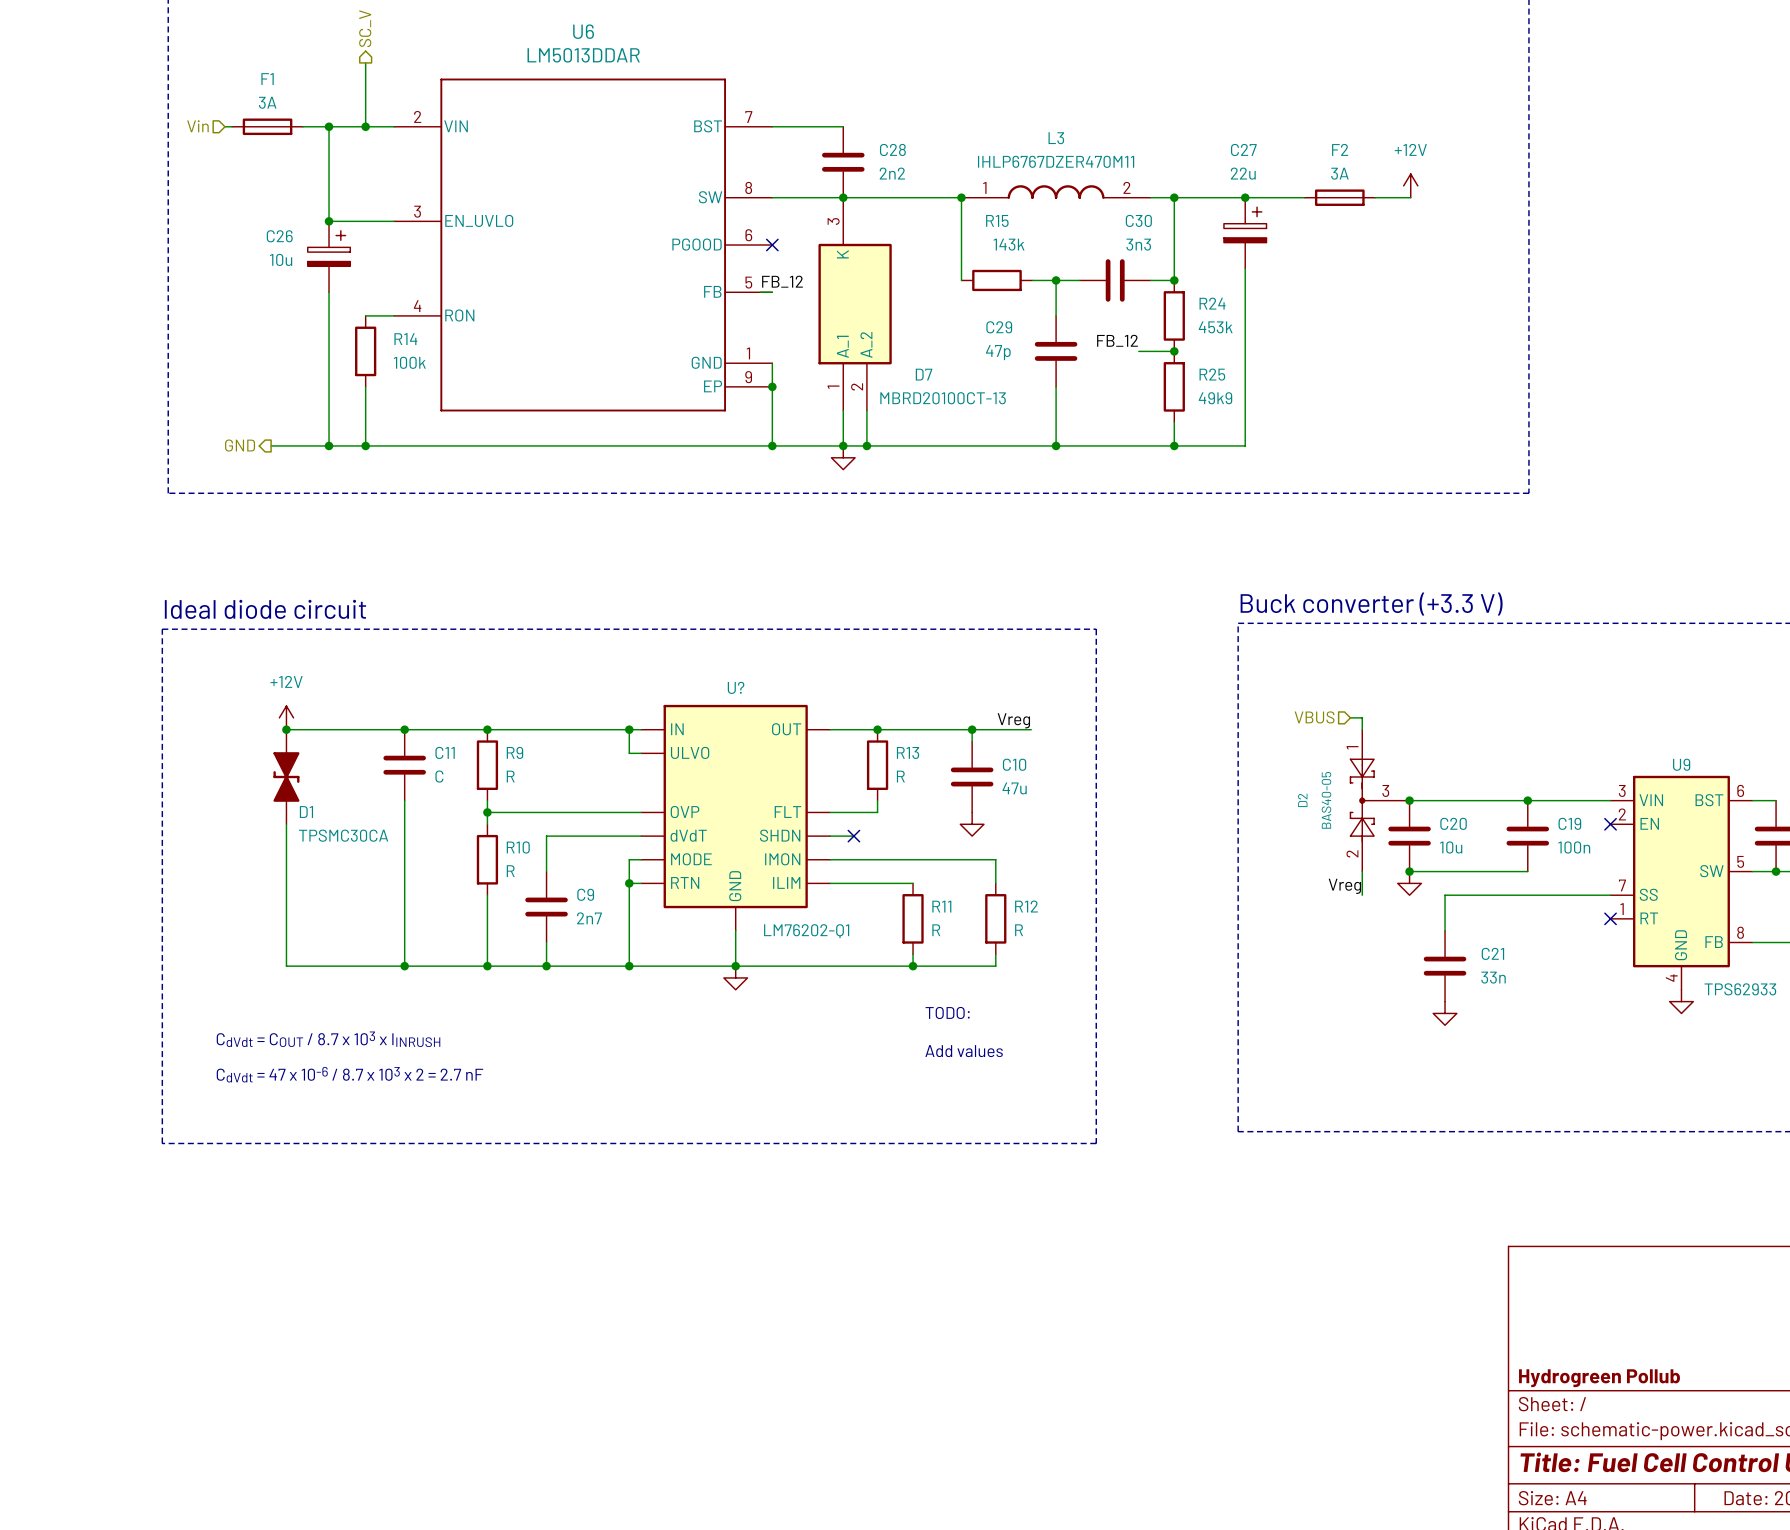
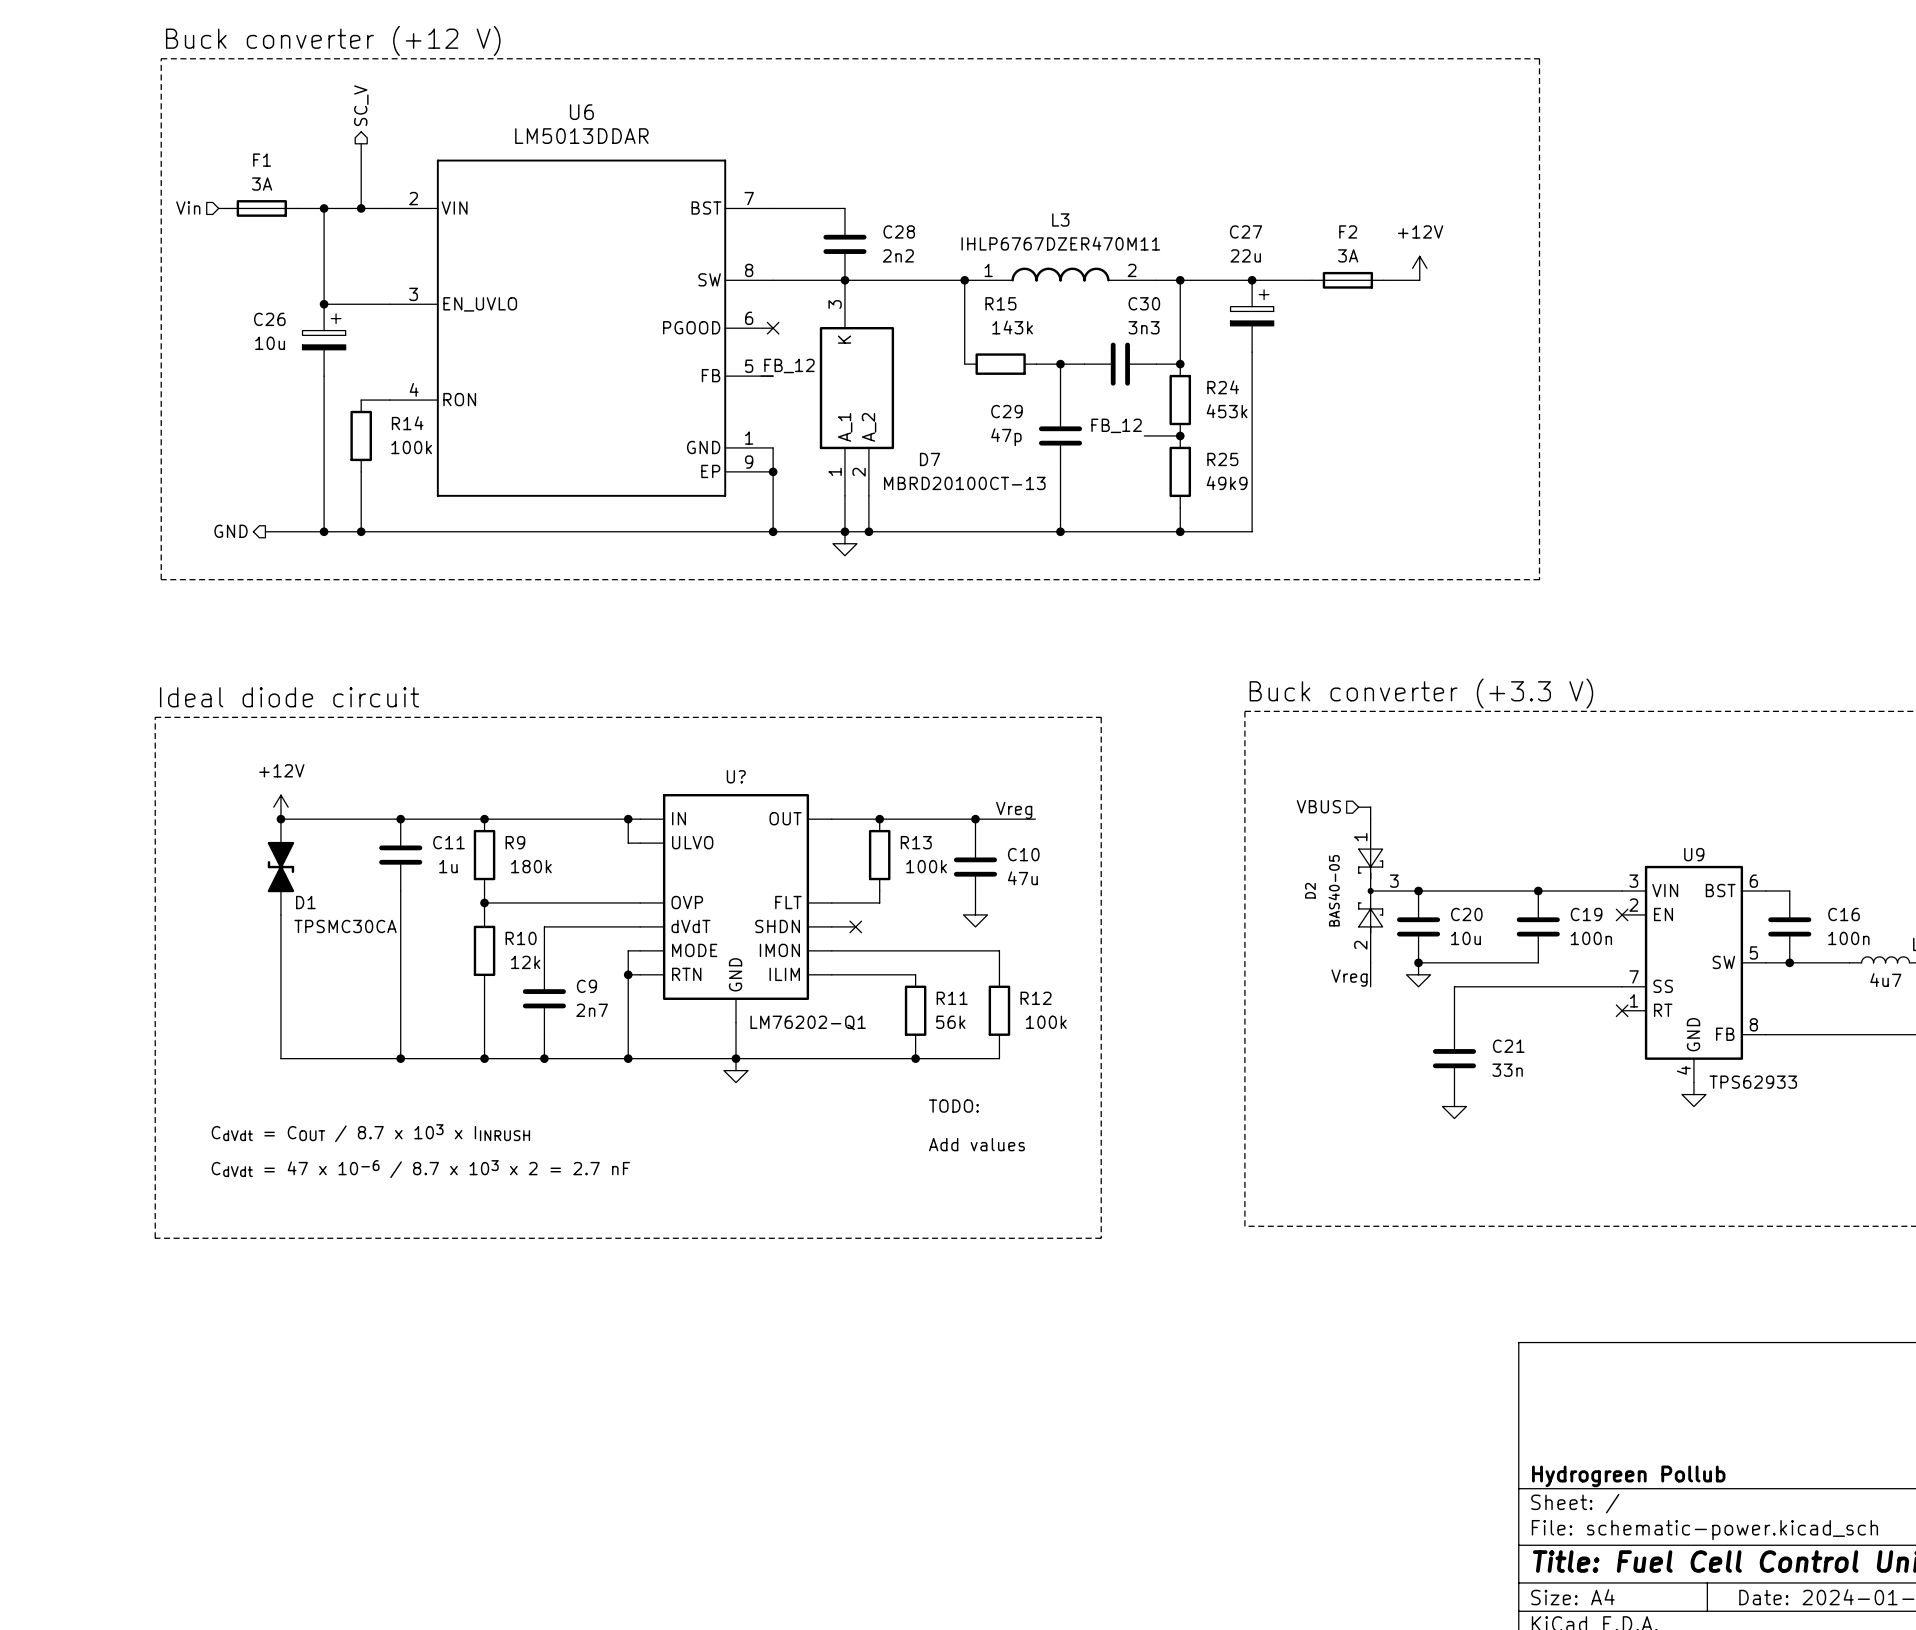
C11 value: C (439, 776) -> 1u (448, 866)
R9 value: R (510, 776) -> 180k (531, 866)
R13 value: R (900, 776) -> 100k (926, 866)
R10 value: R (510, 871) -> 12k (525, 962)
R11 value: R (936, 930) -> 56k (950, 1022)
R12 value: R (1019, 930) -> 100k (1046, 1022)

